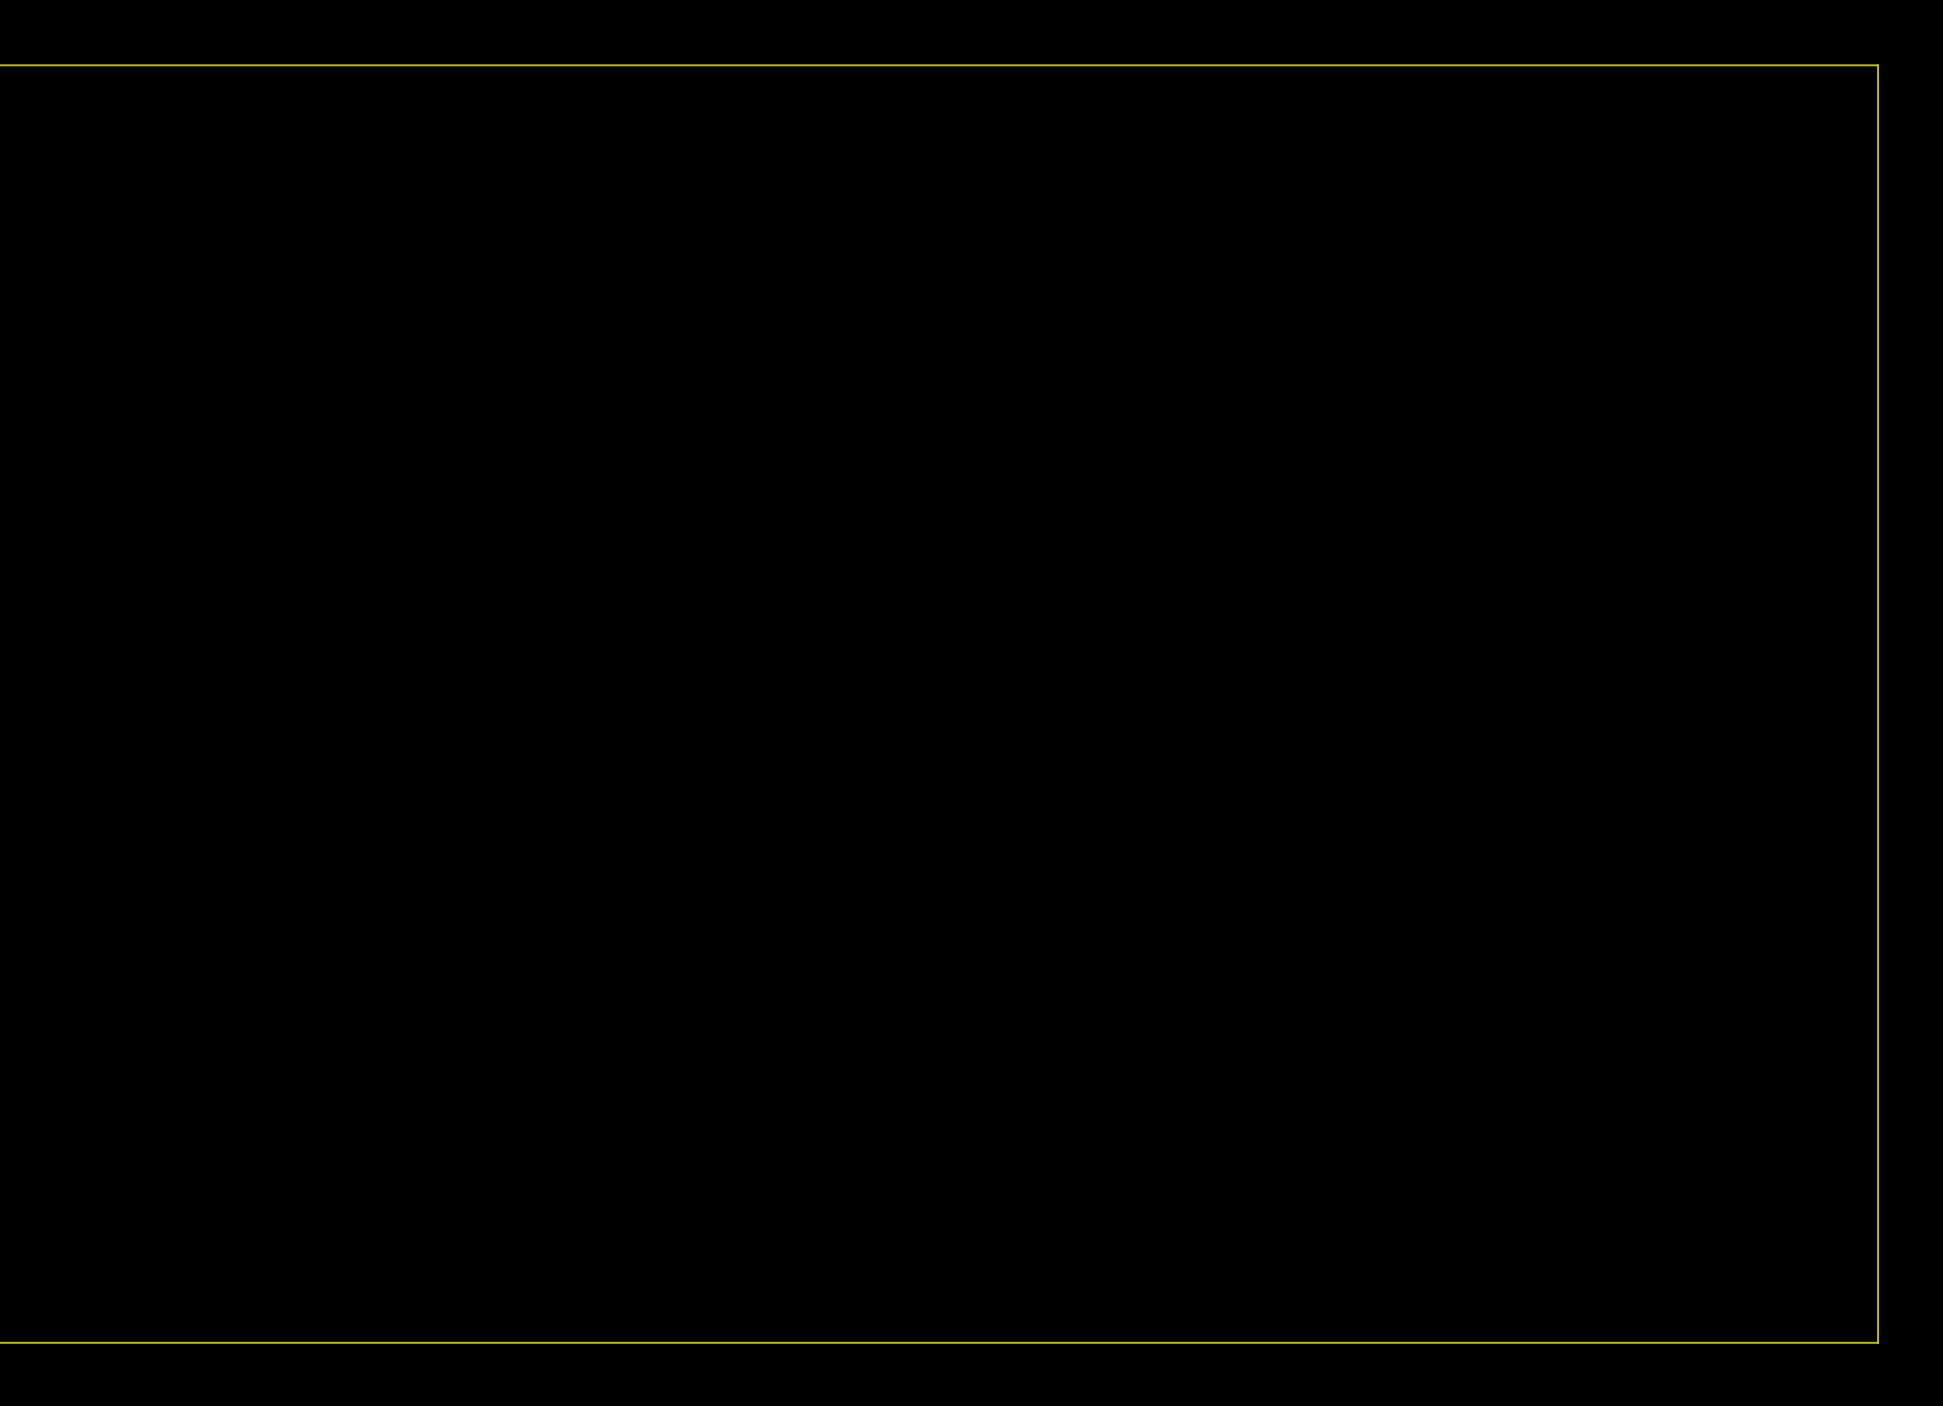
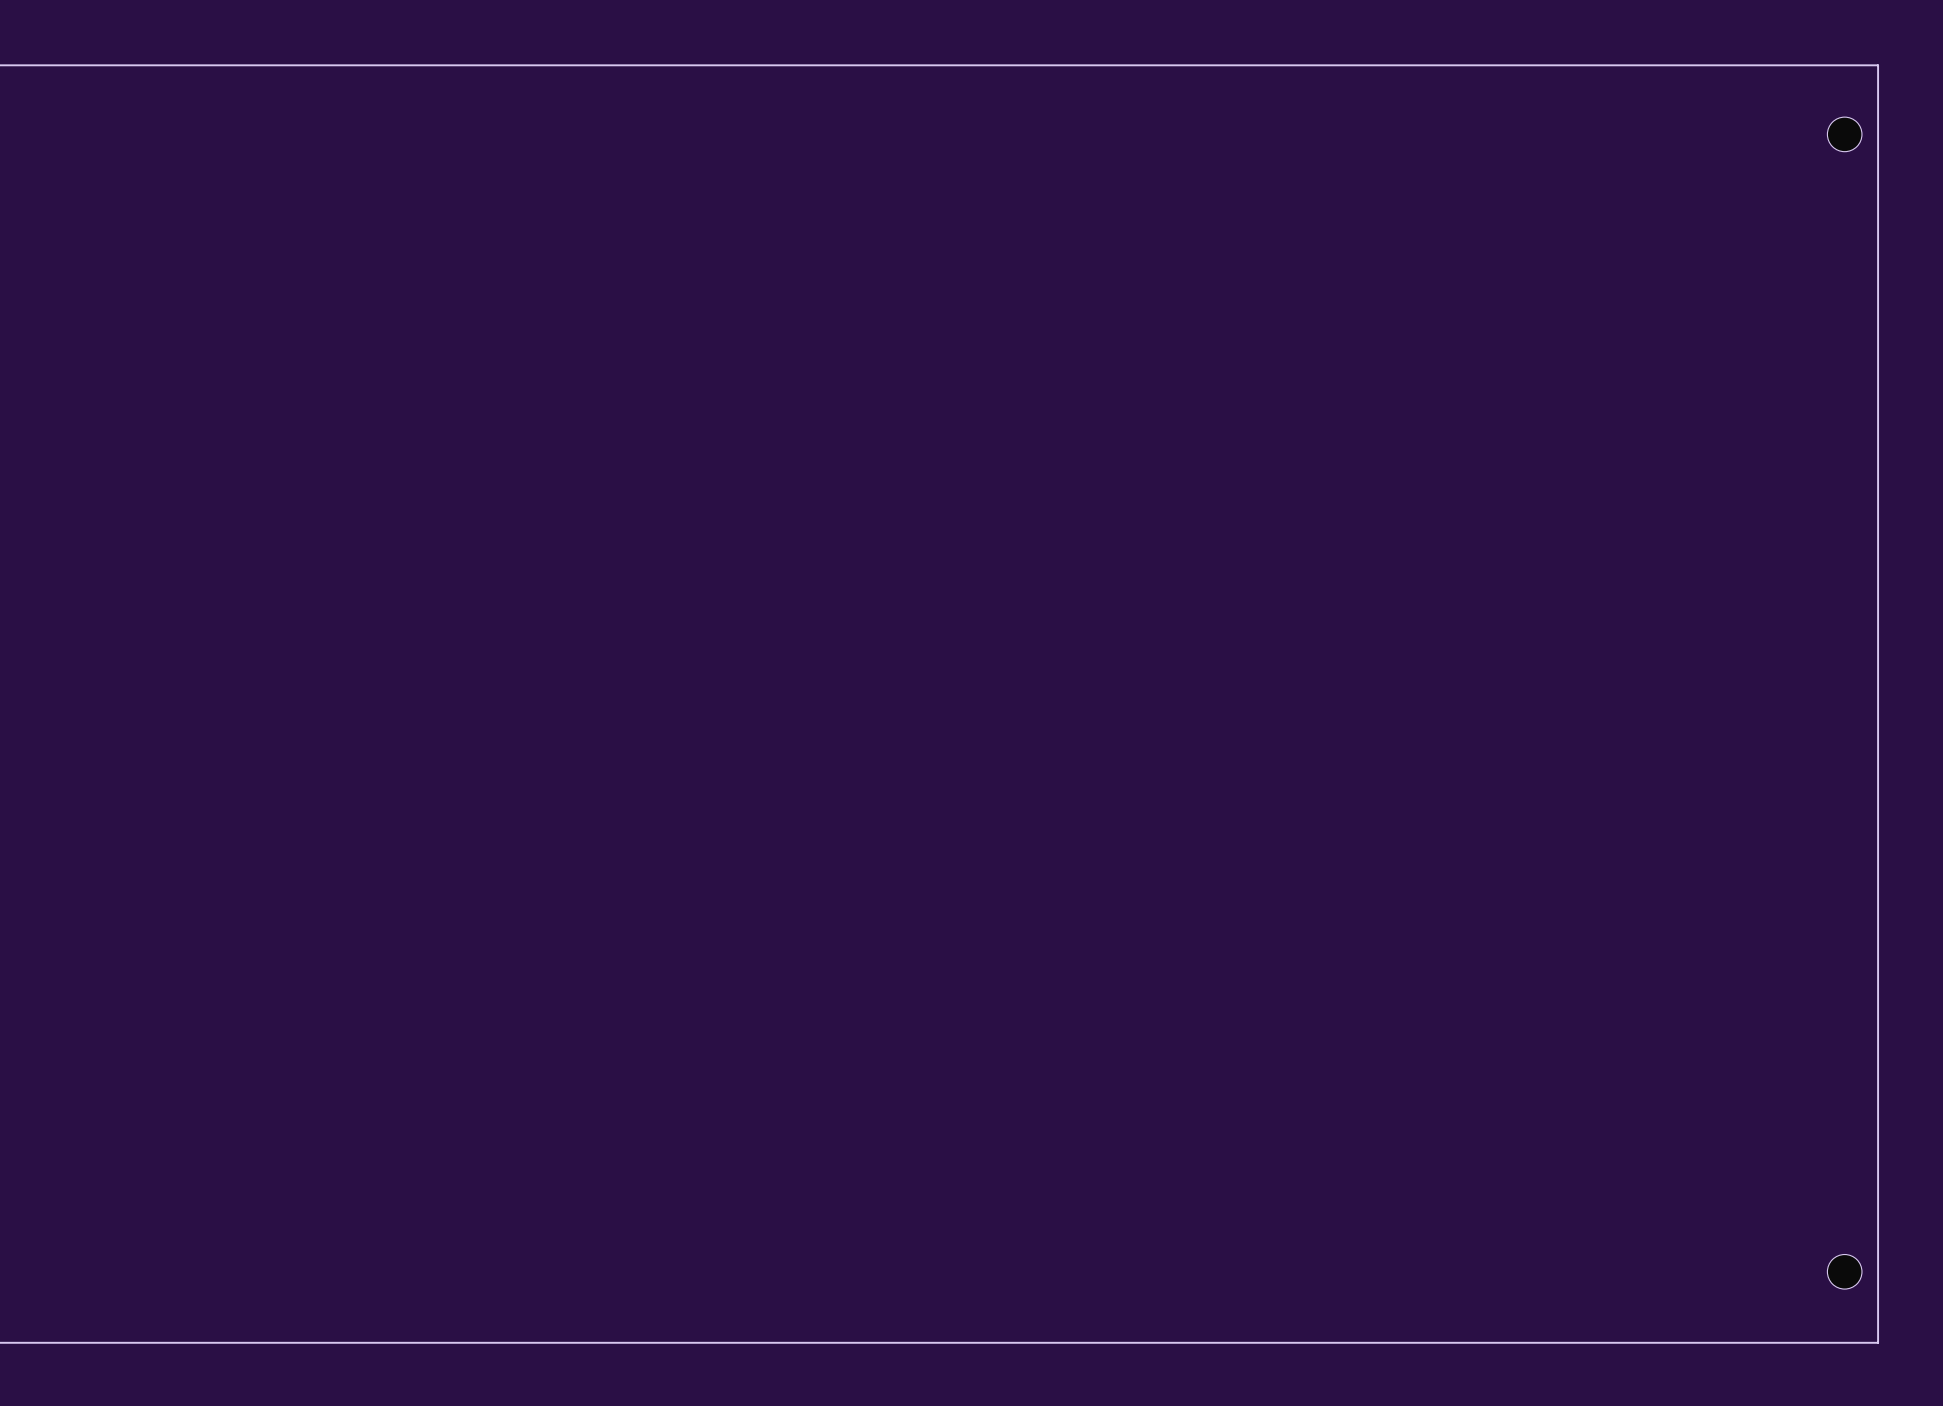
part: none -> (1844, 134)
part: none -> (1844, 1271)

